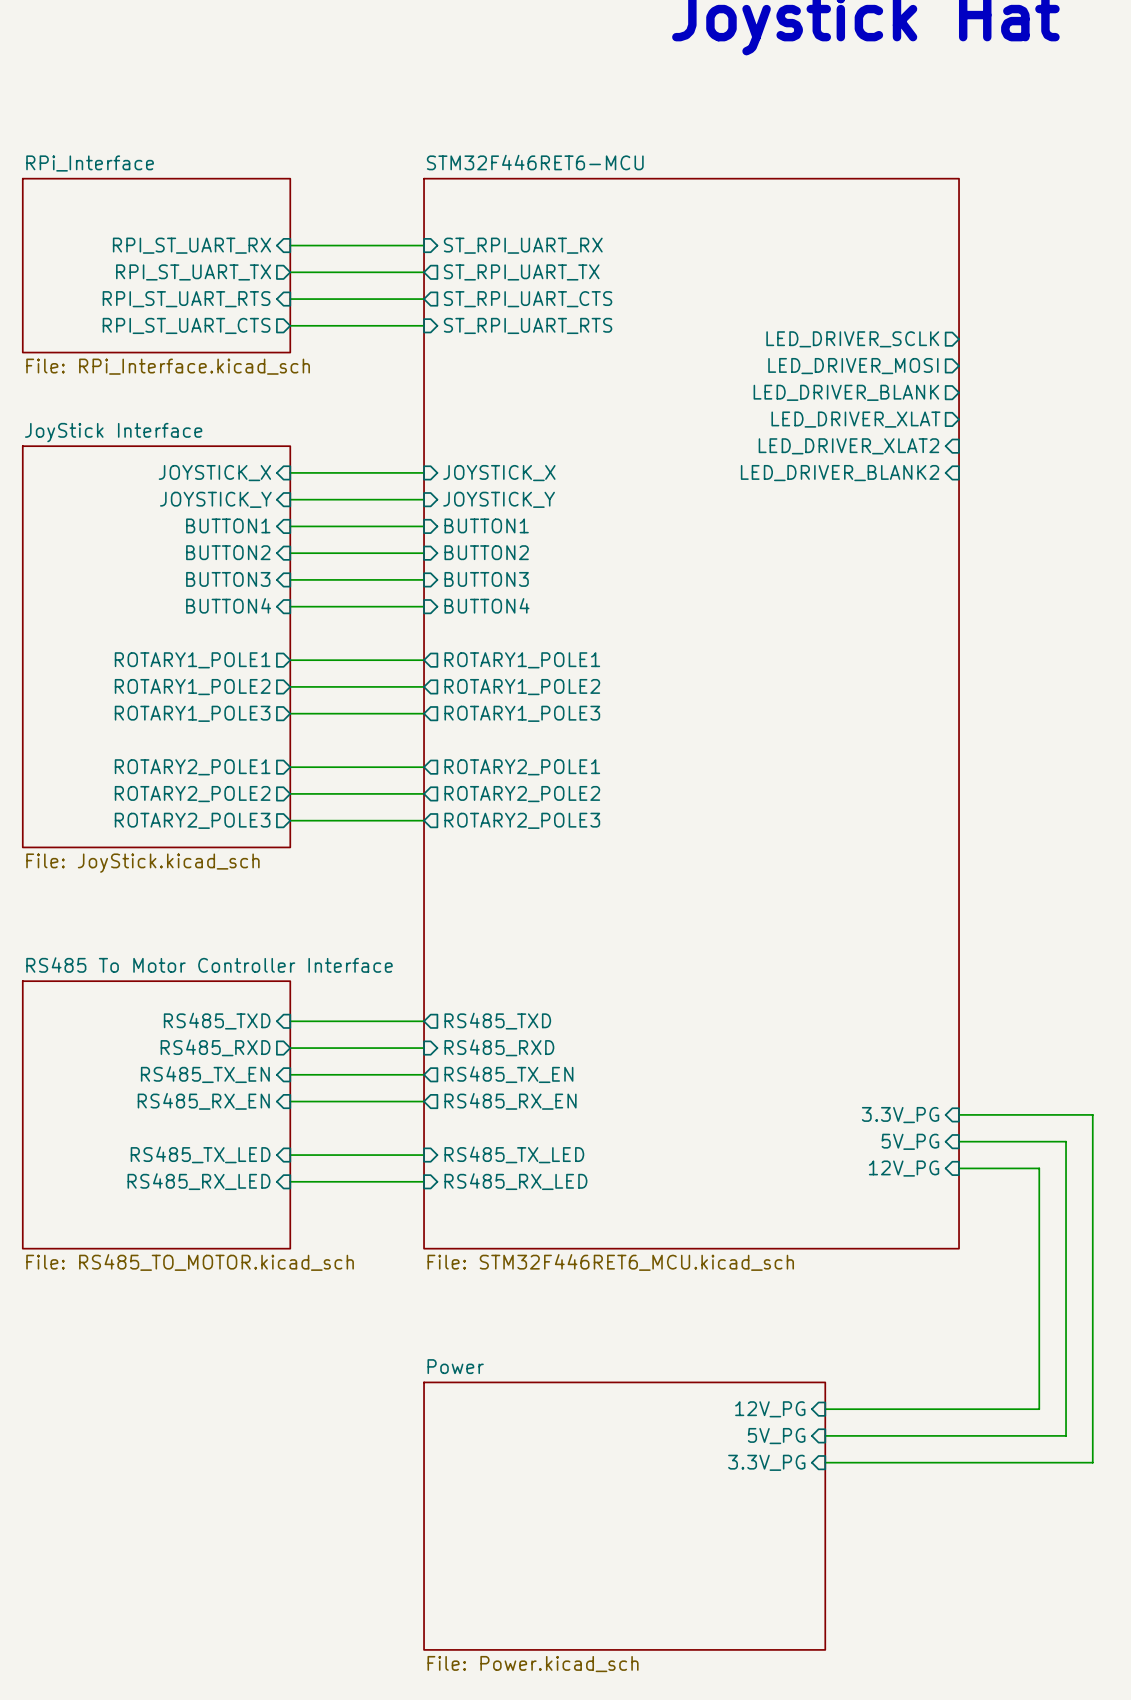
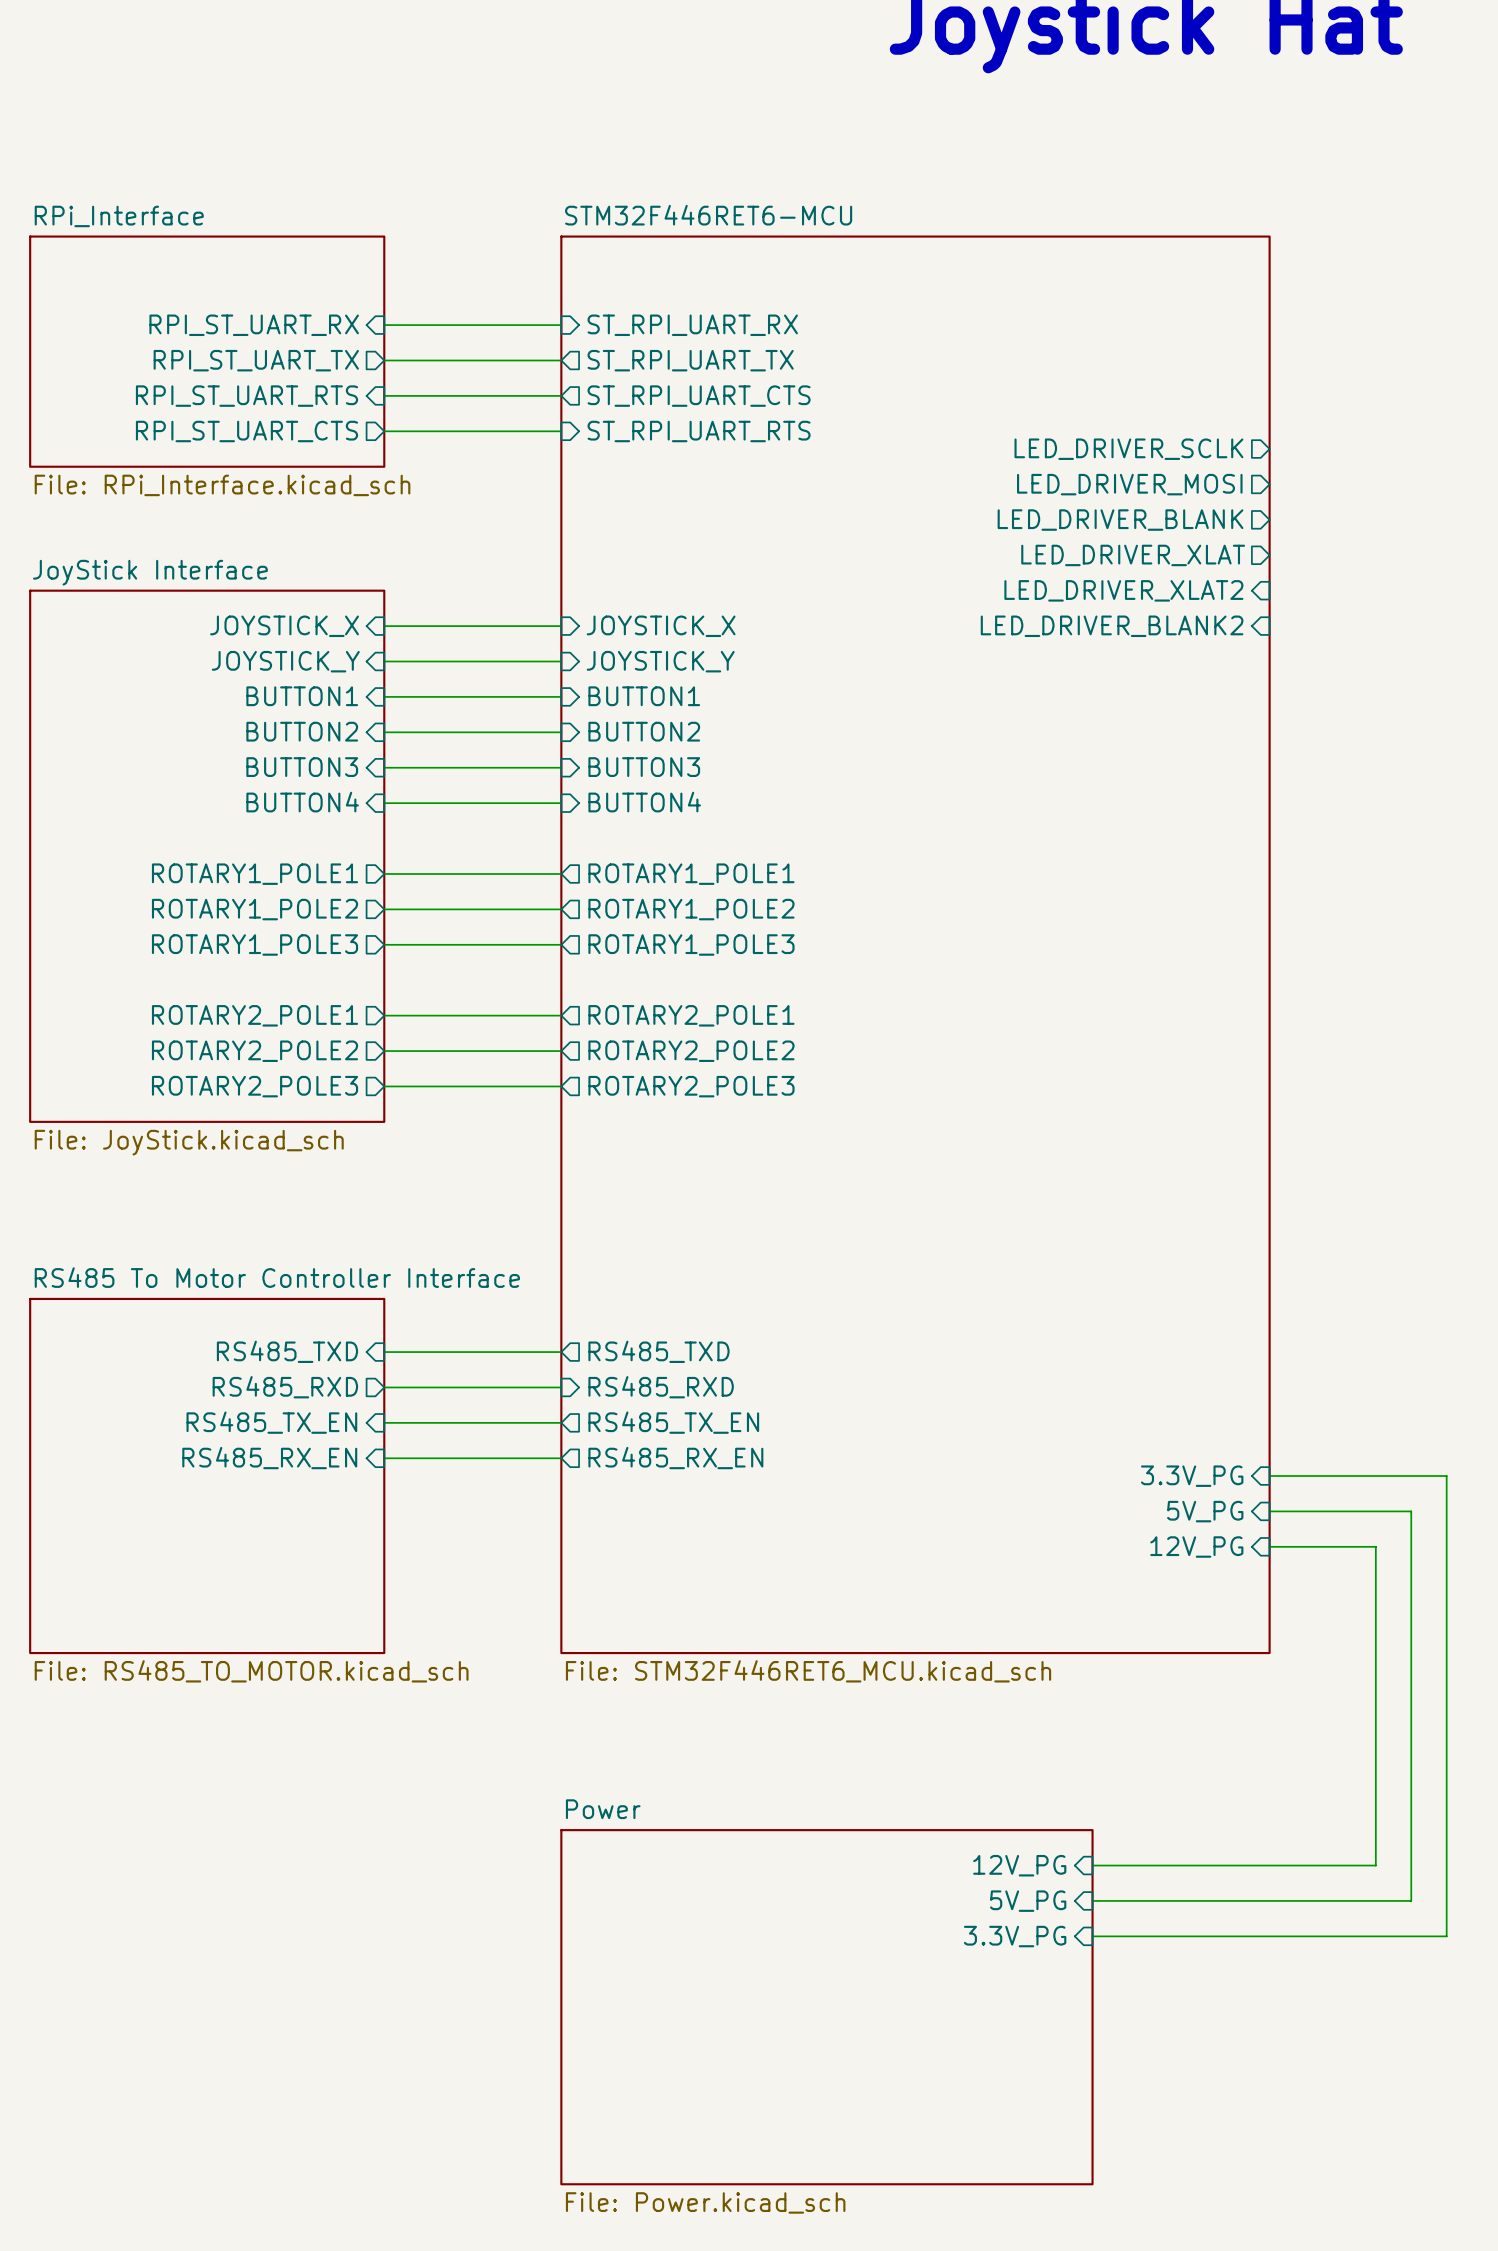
sheet pin: RS485_TX_LED (200, 1154) -> none
sheet pin: RS485_TX_LED (514, 1154) -> none
wire: (290, 1155) (424, 1155) -> none
sheet pin: RS485_RX_LED (198, 1181) -> none
wire: (290, 1181) (424, 1181) -> none
sheet pin: RS485_RX_LED (515, 1181) -> none

